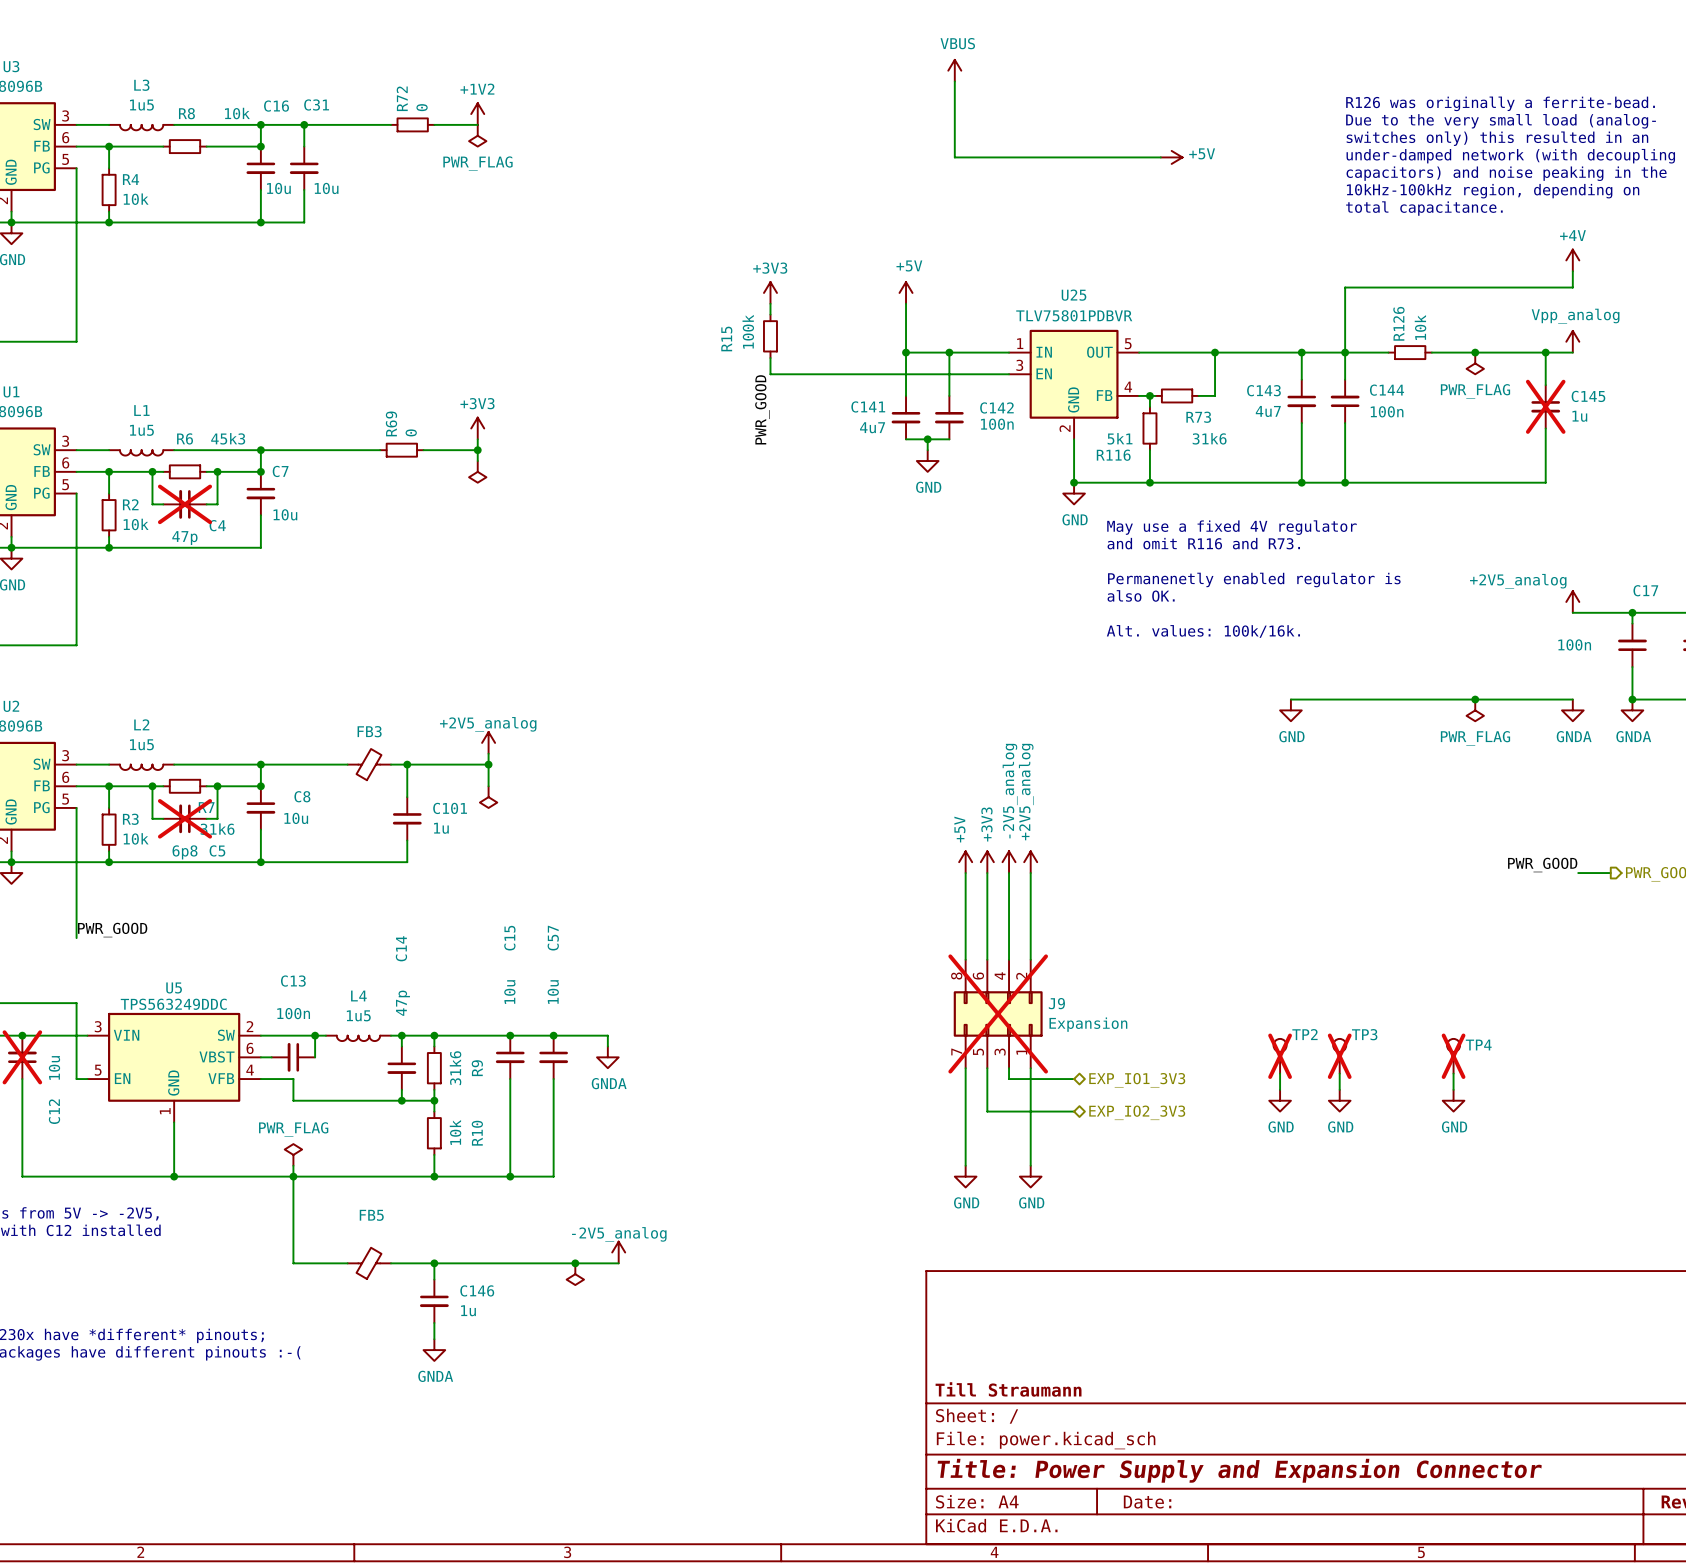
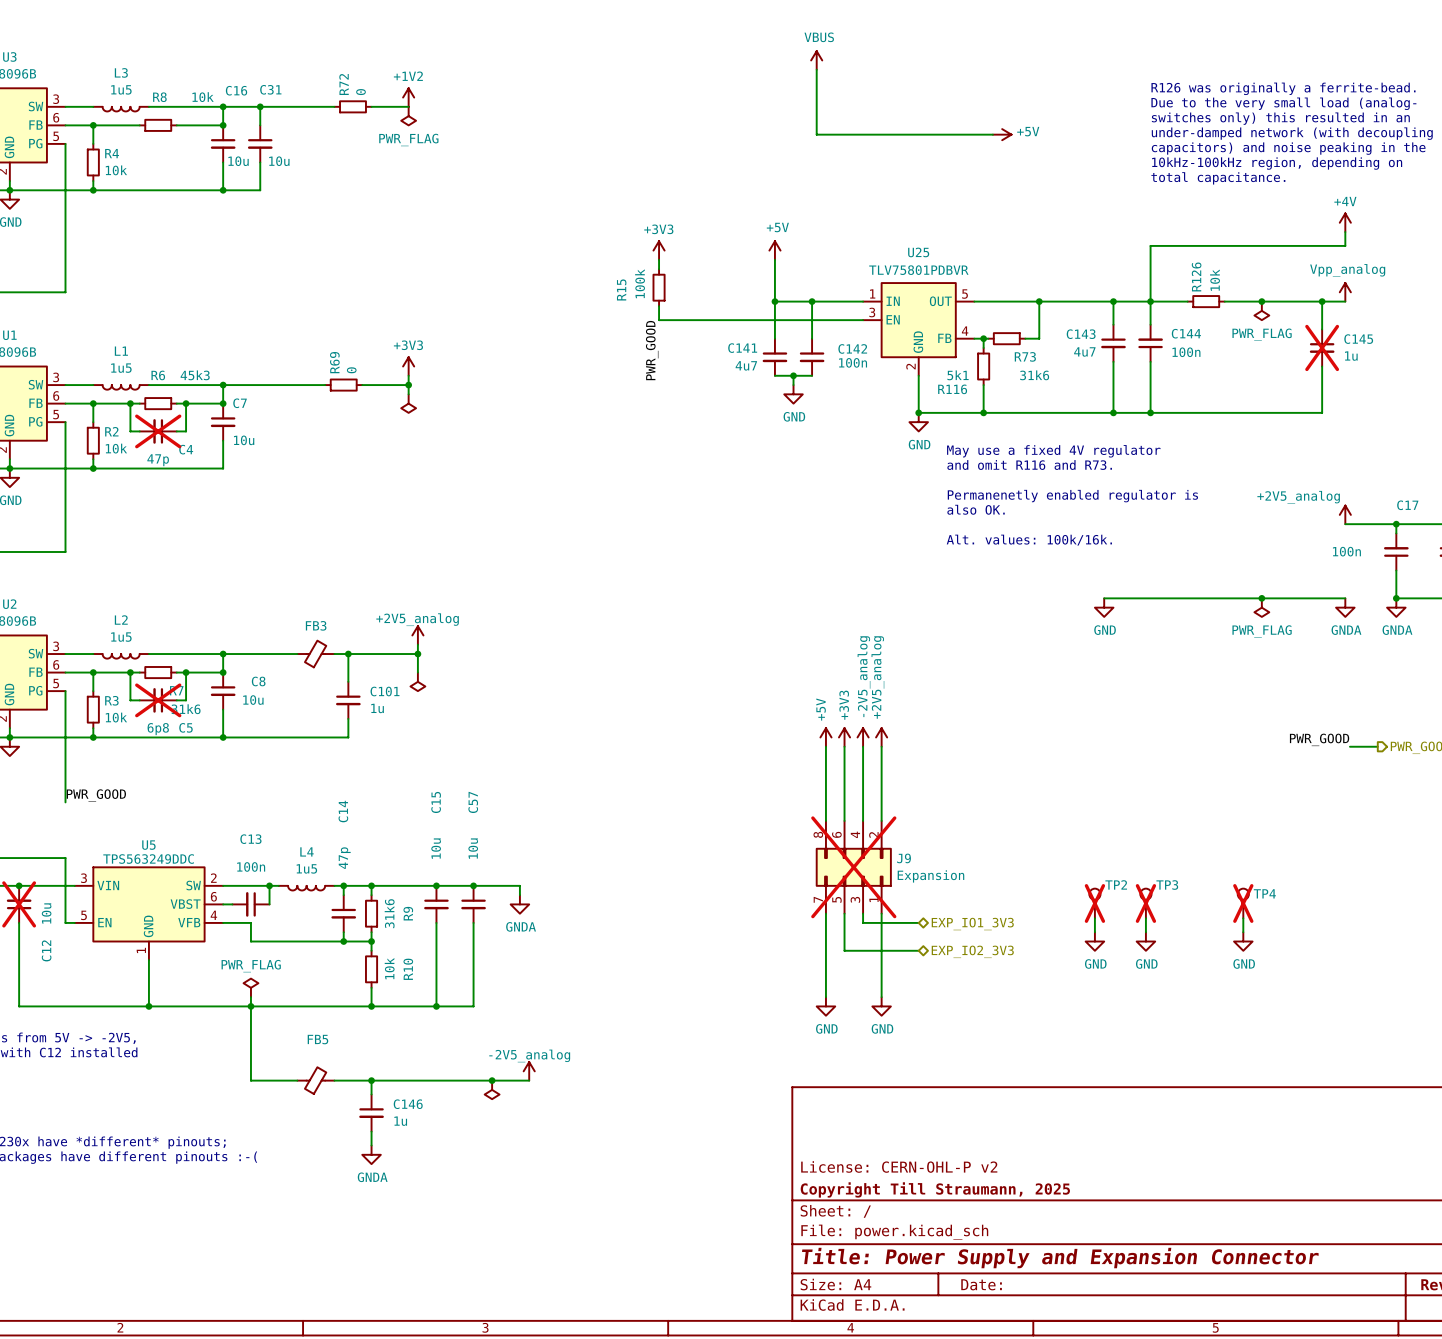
title block: none -> License: CERN-OHL-P v2 (899, 1166)
title block: Till Straumann (1008, 1389) -> Copyright Till Straumann, 2025 (935, 1189)

